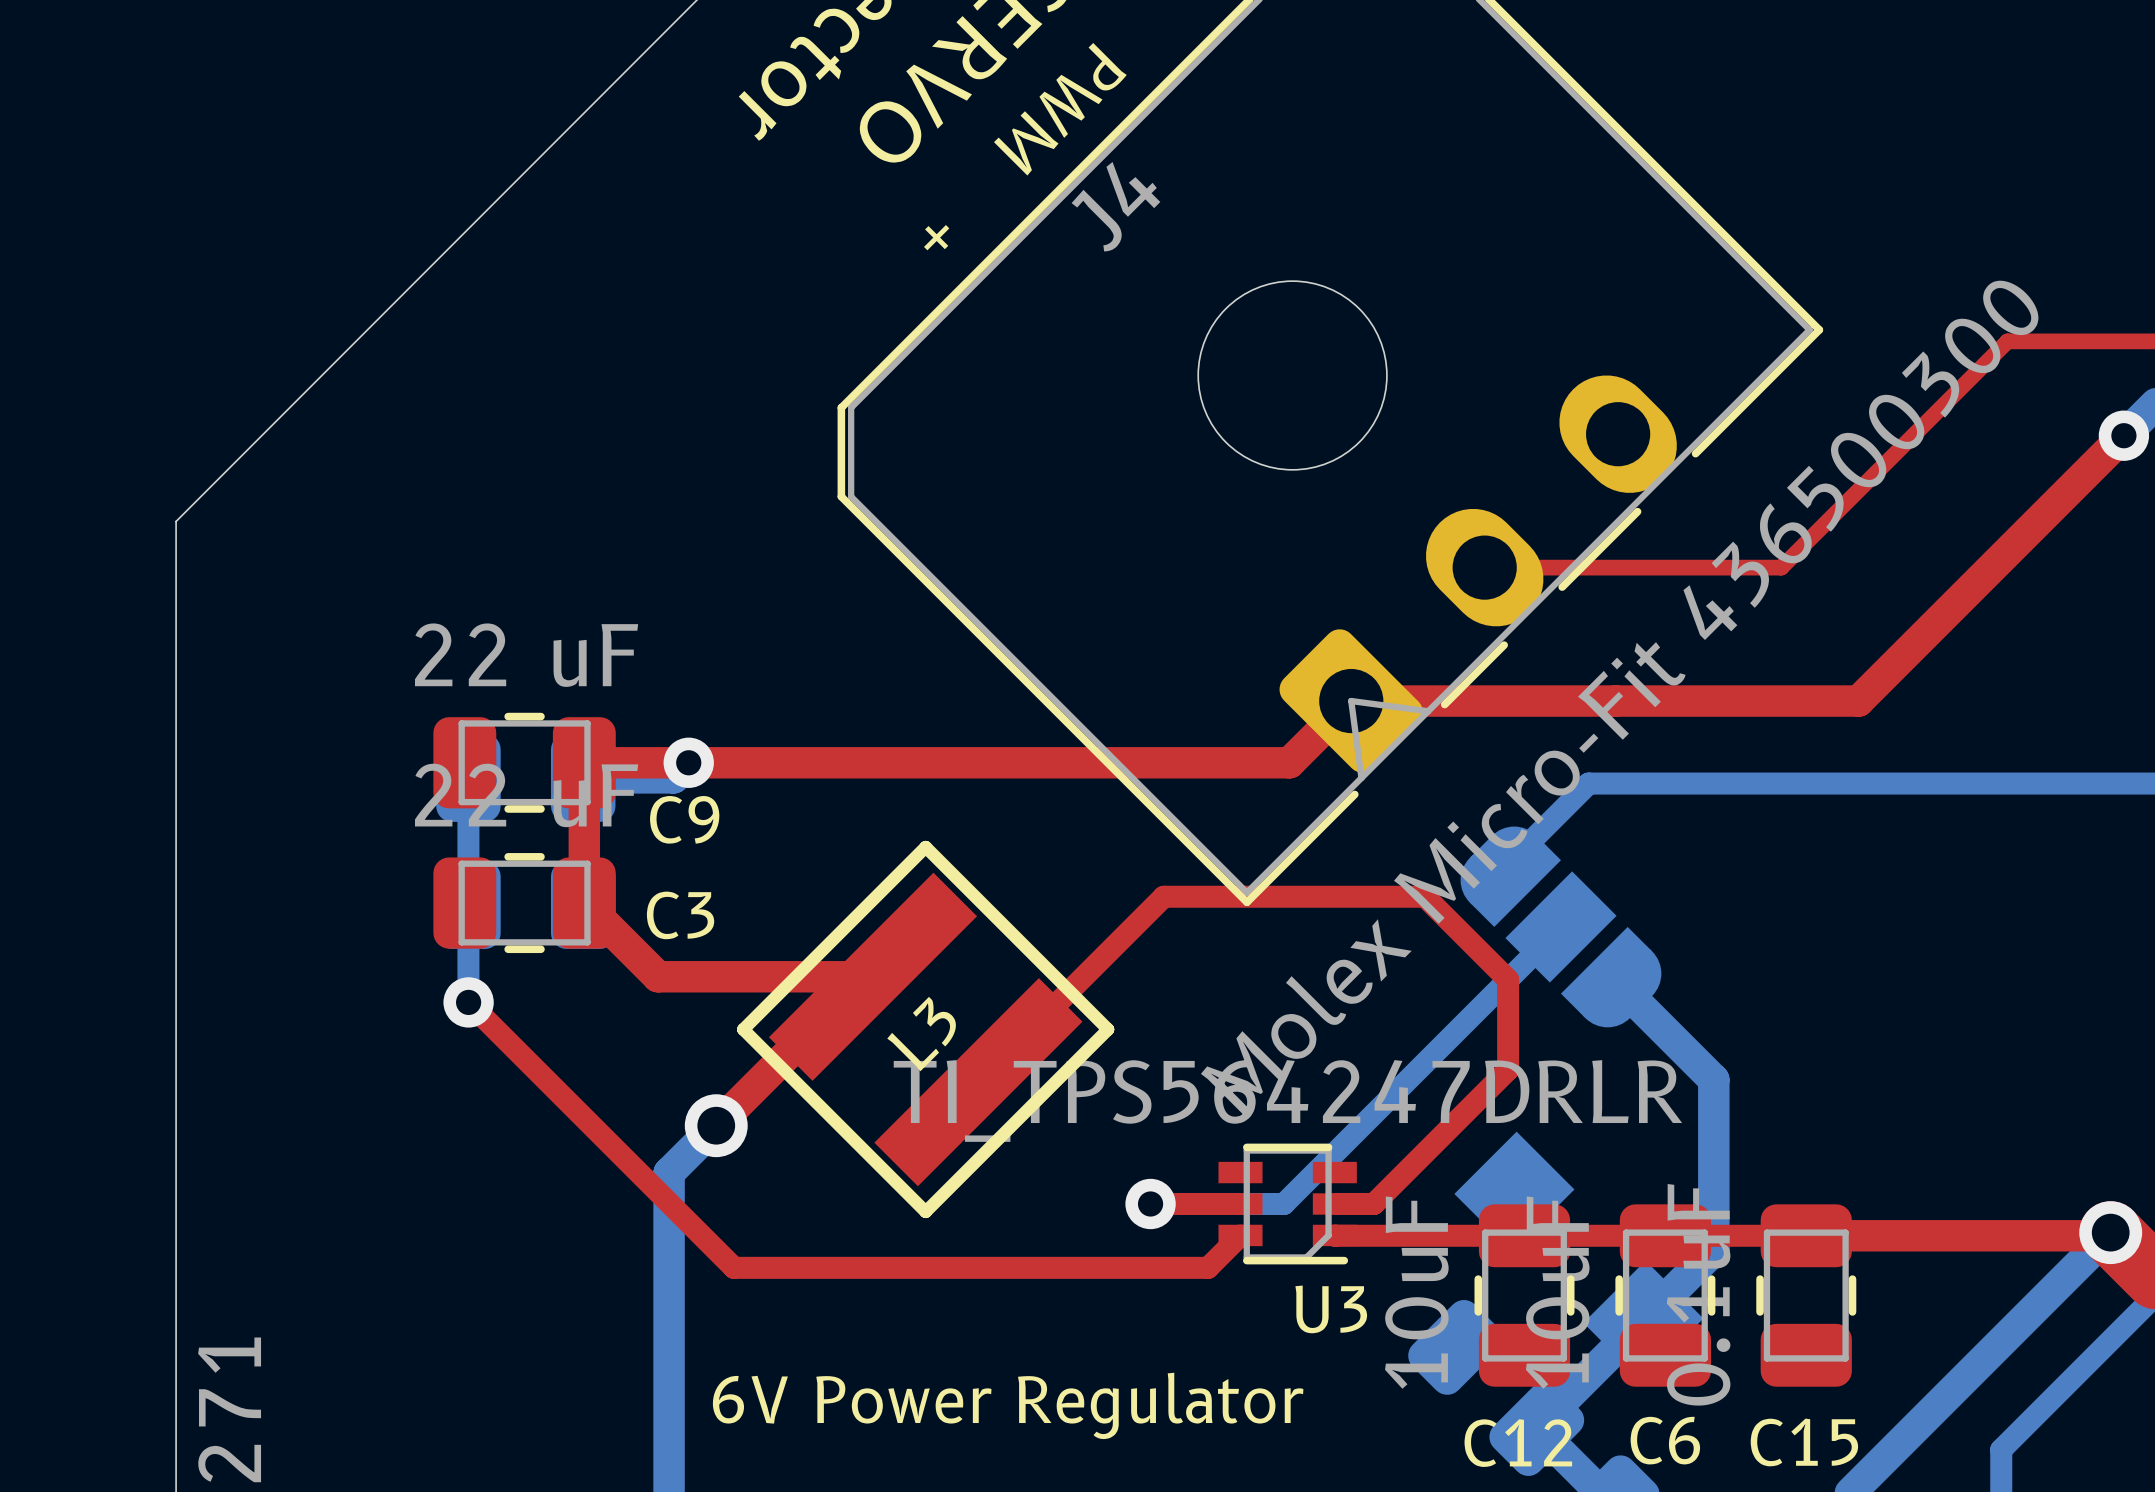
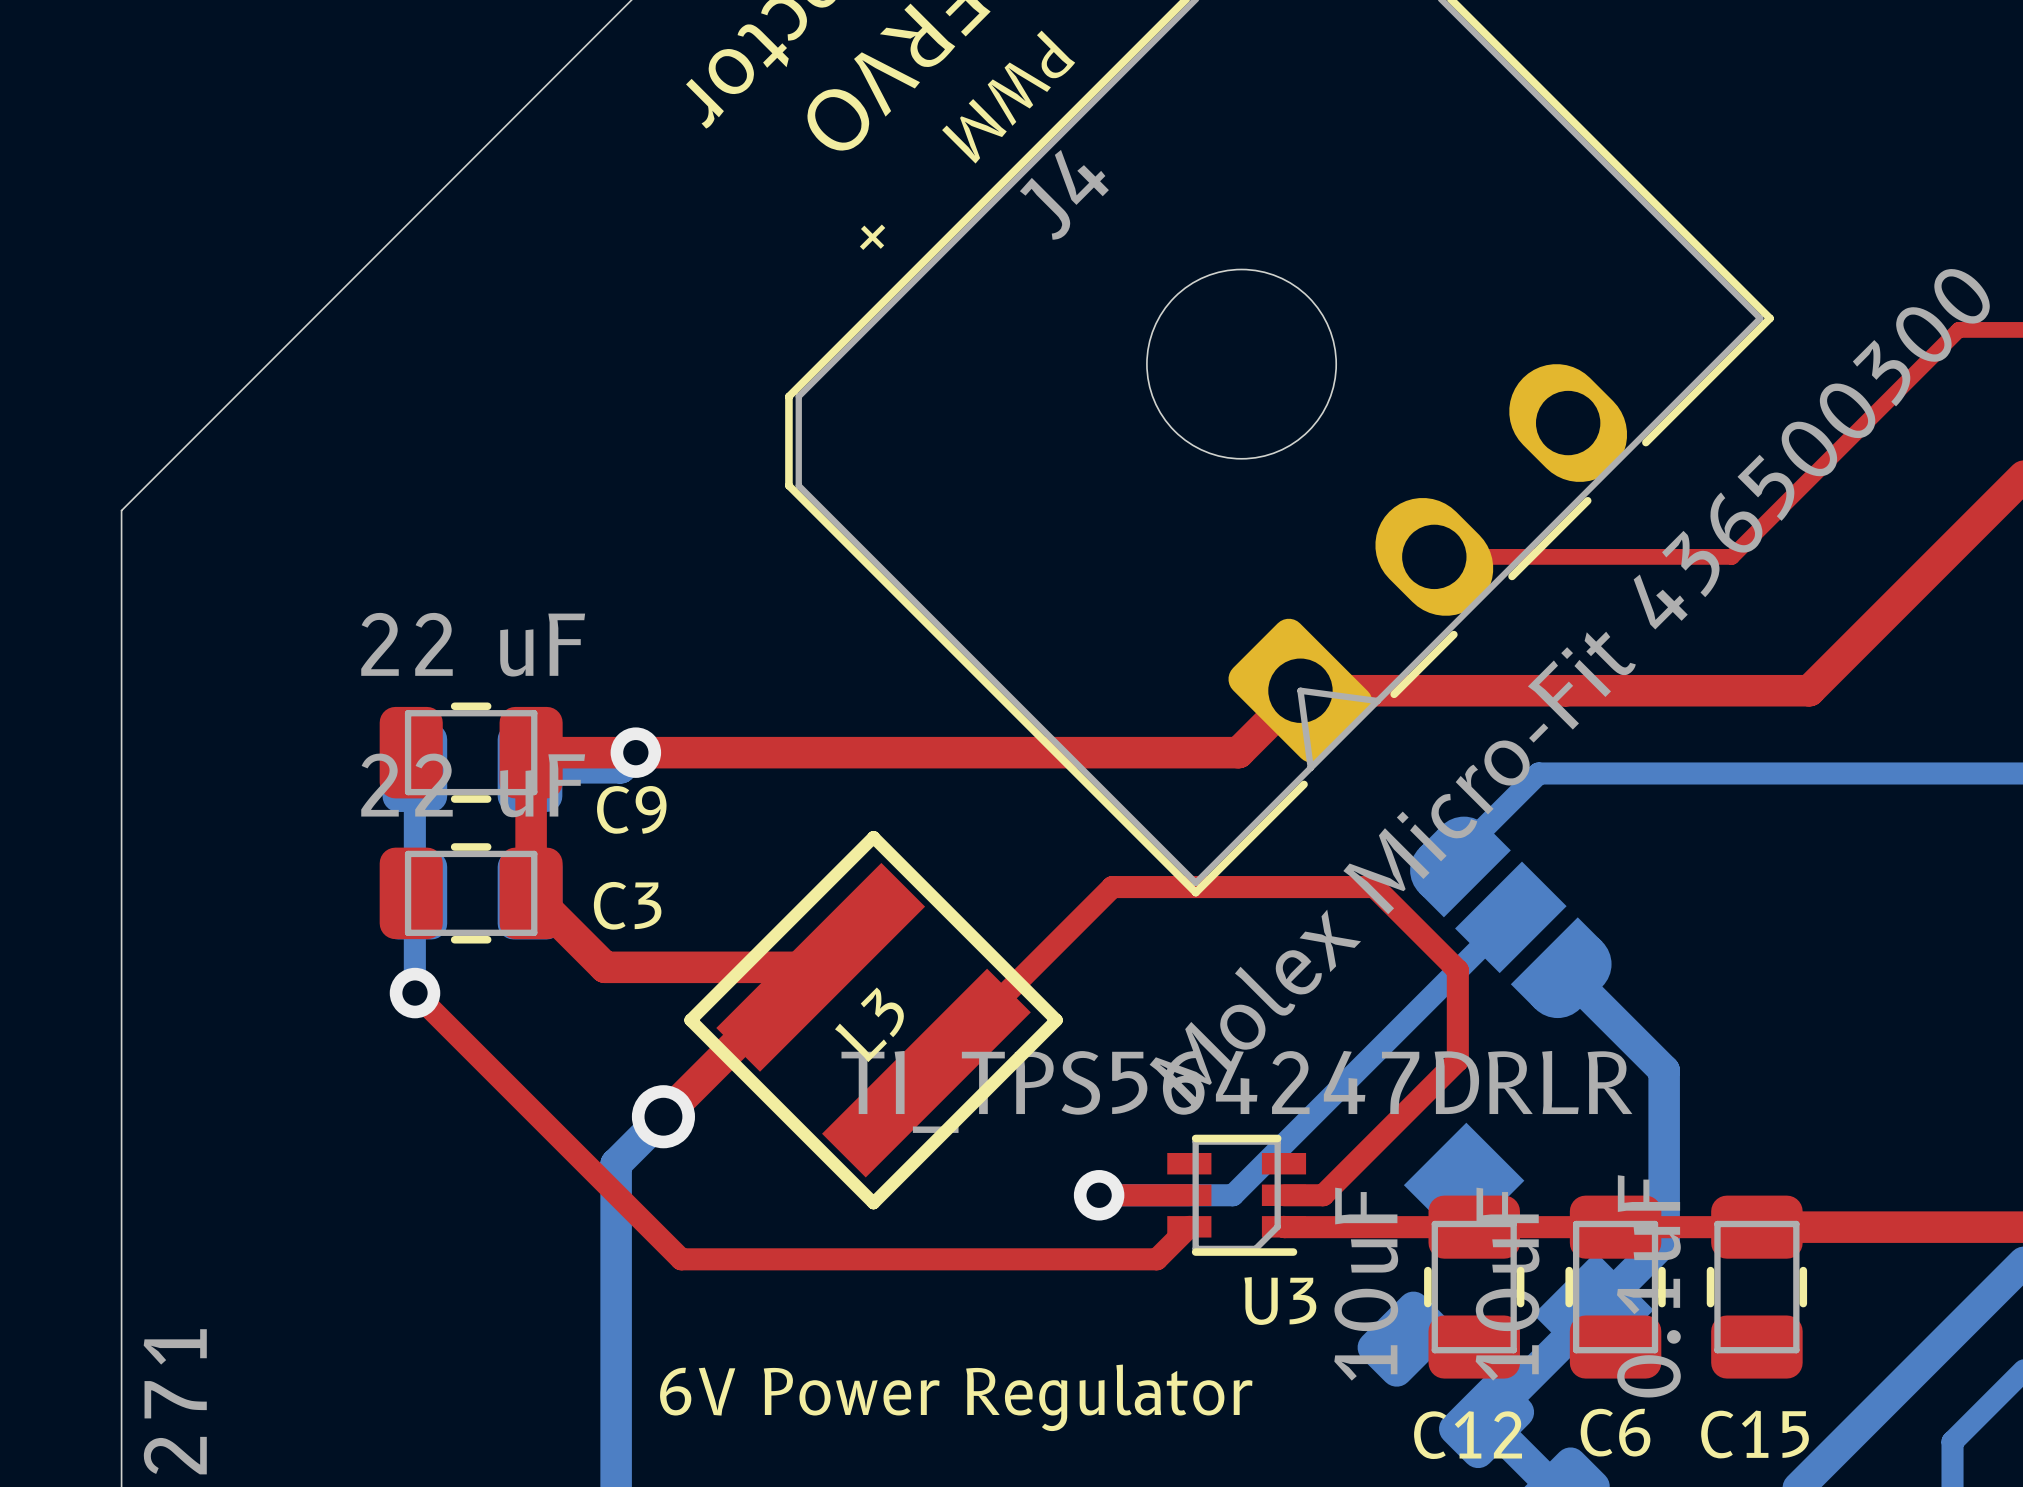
text position: + (936, 237) -> + (872, 237)

